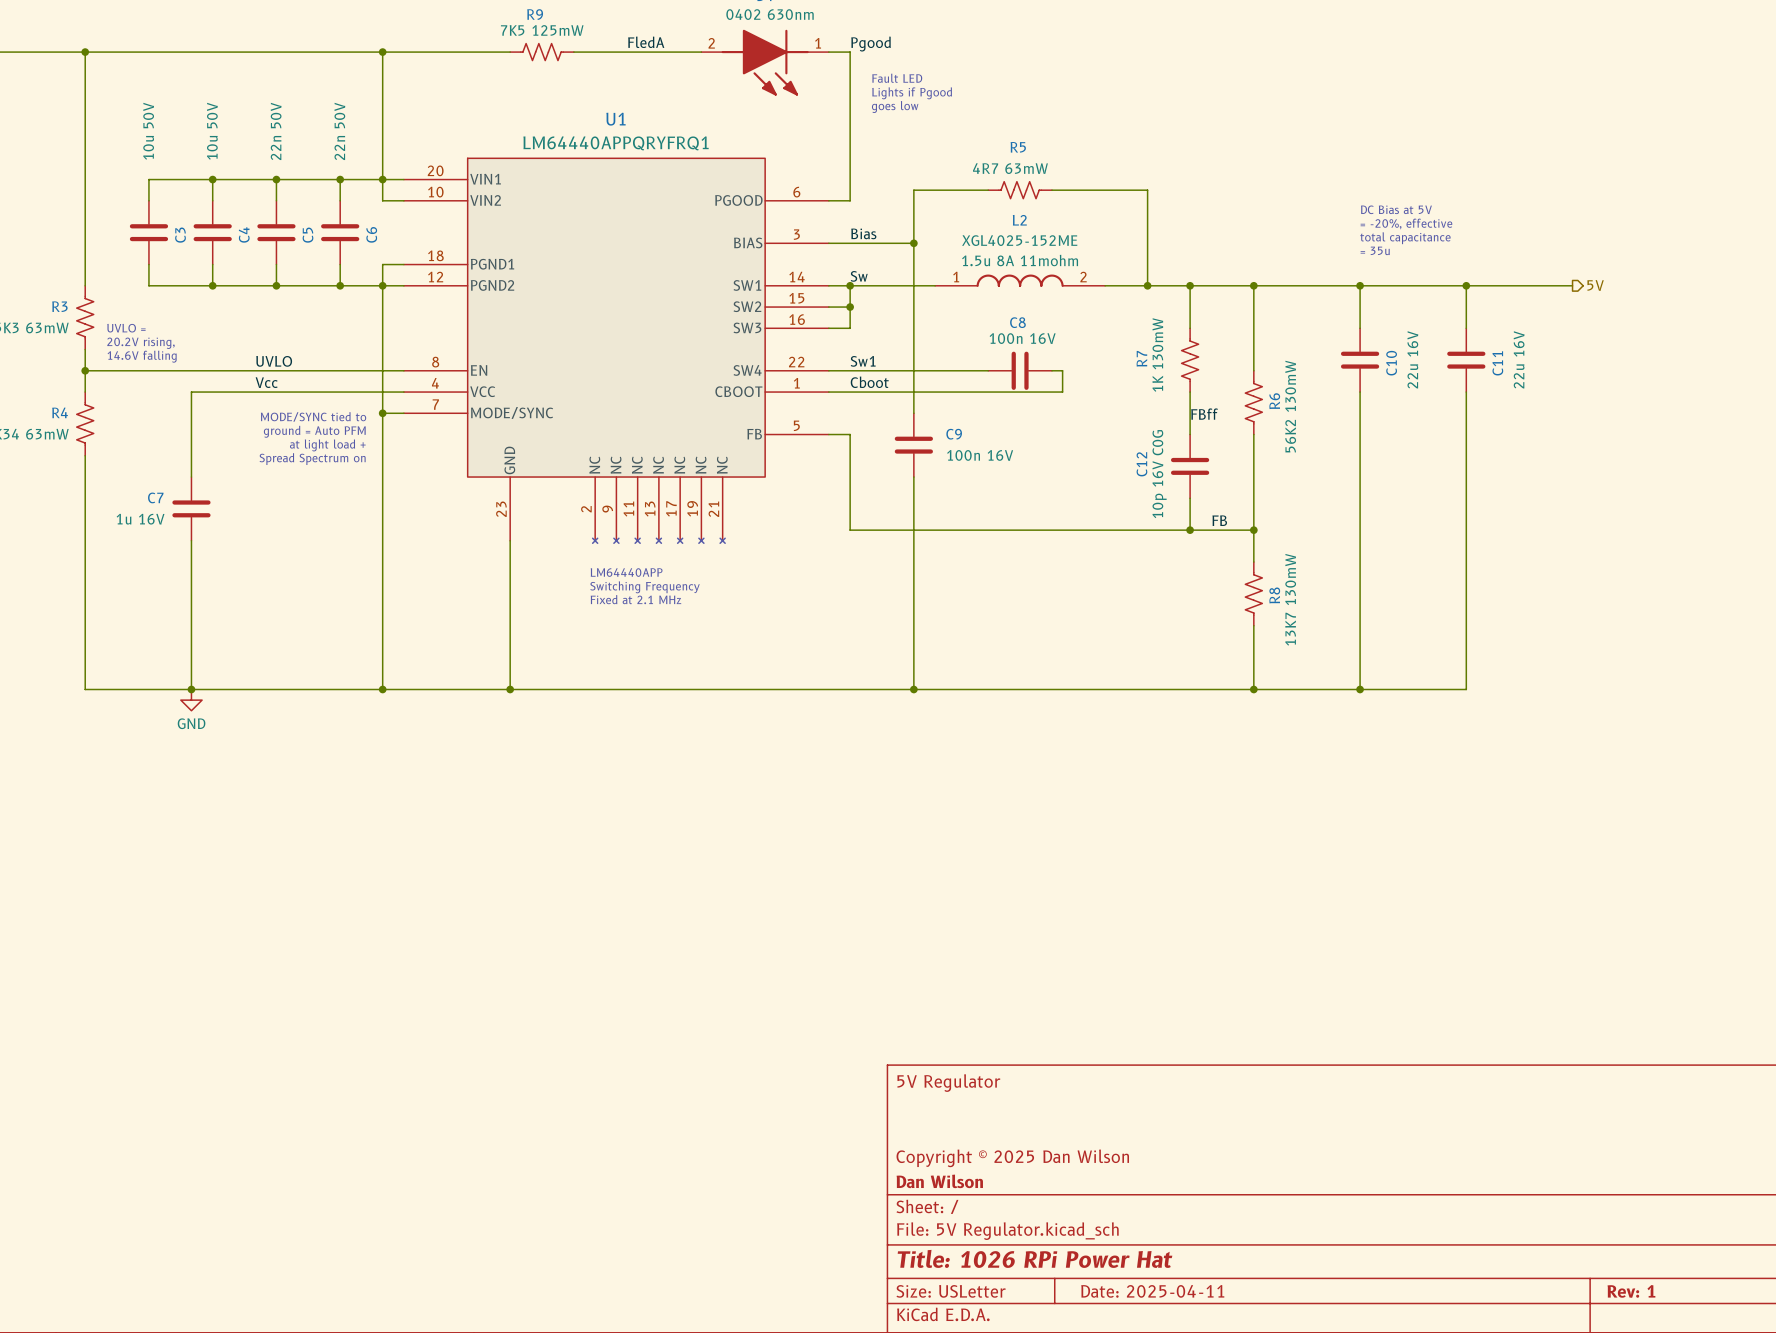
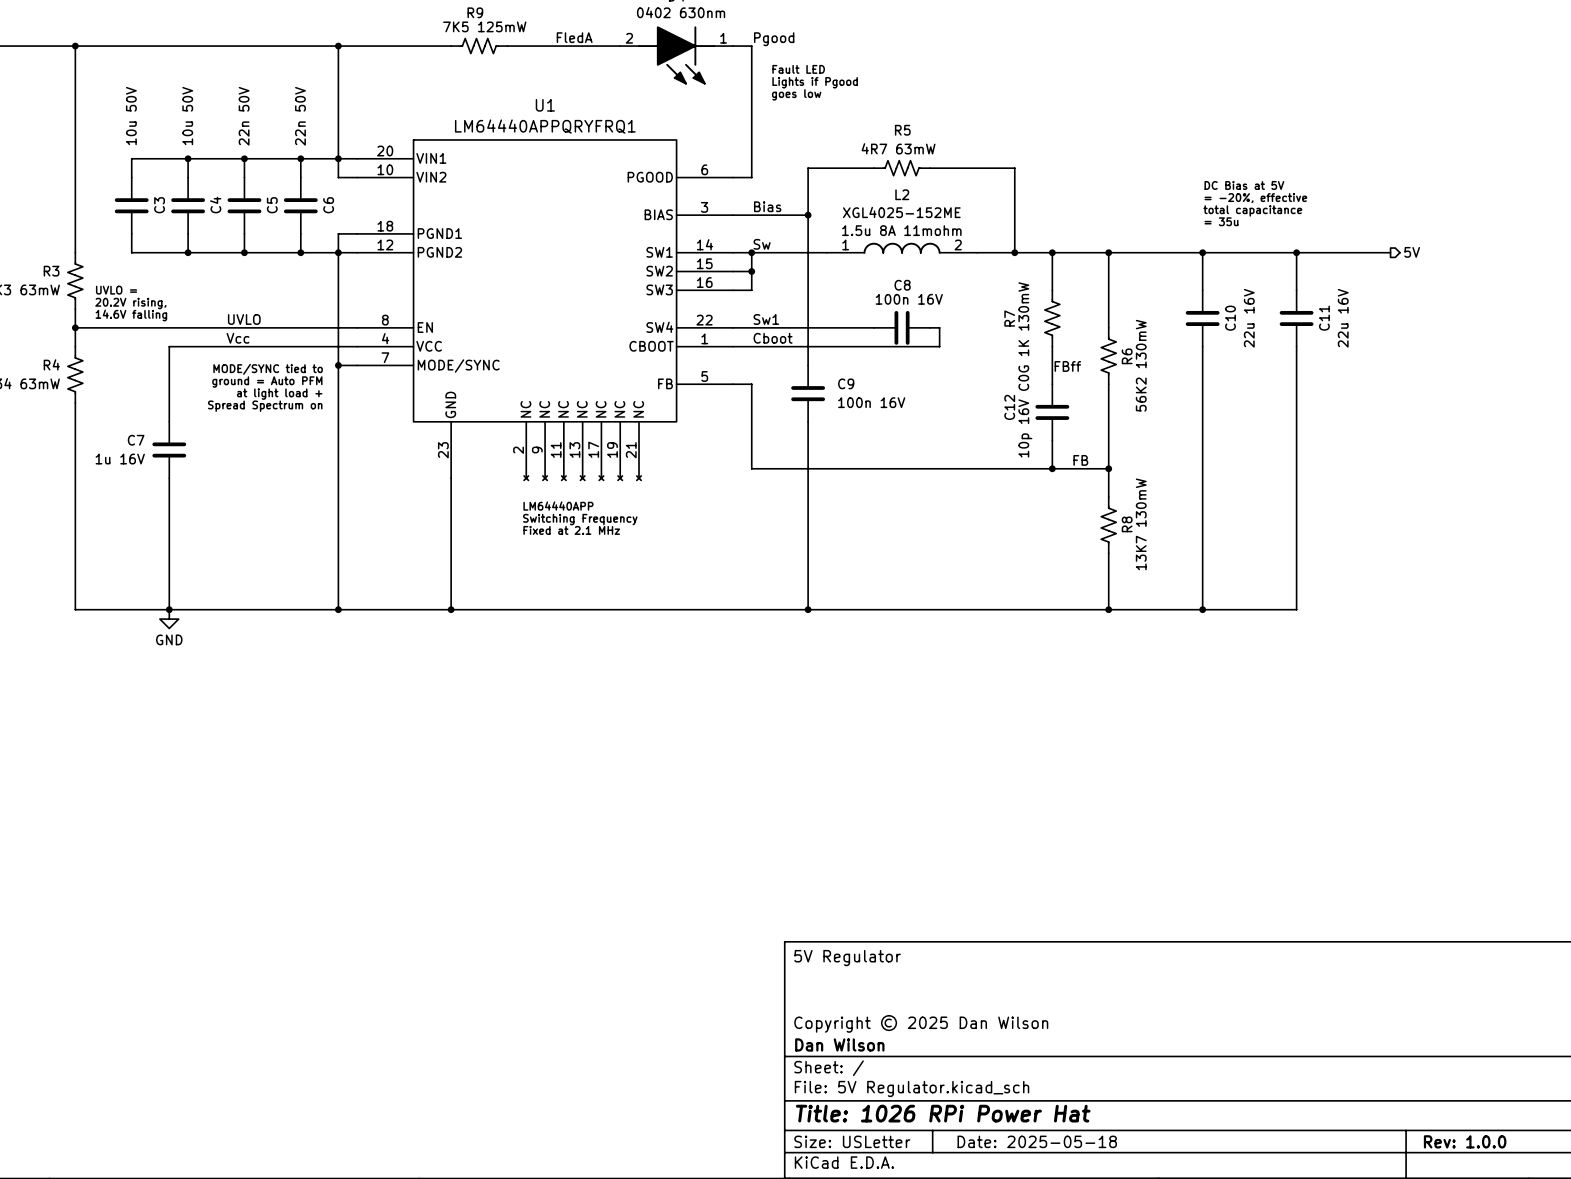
title block: Date: 2025-04-11 (1152, 1291) -> Date: 2025-05-18 (1037, 1141)
title block: Rev: 1 (1631, 1291) -> Rev: 1.0.0 (1465, 1141)

